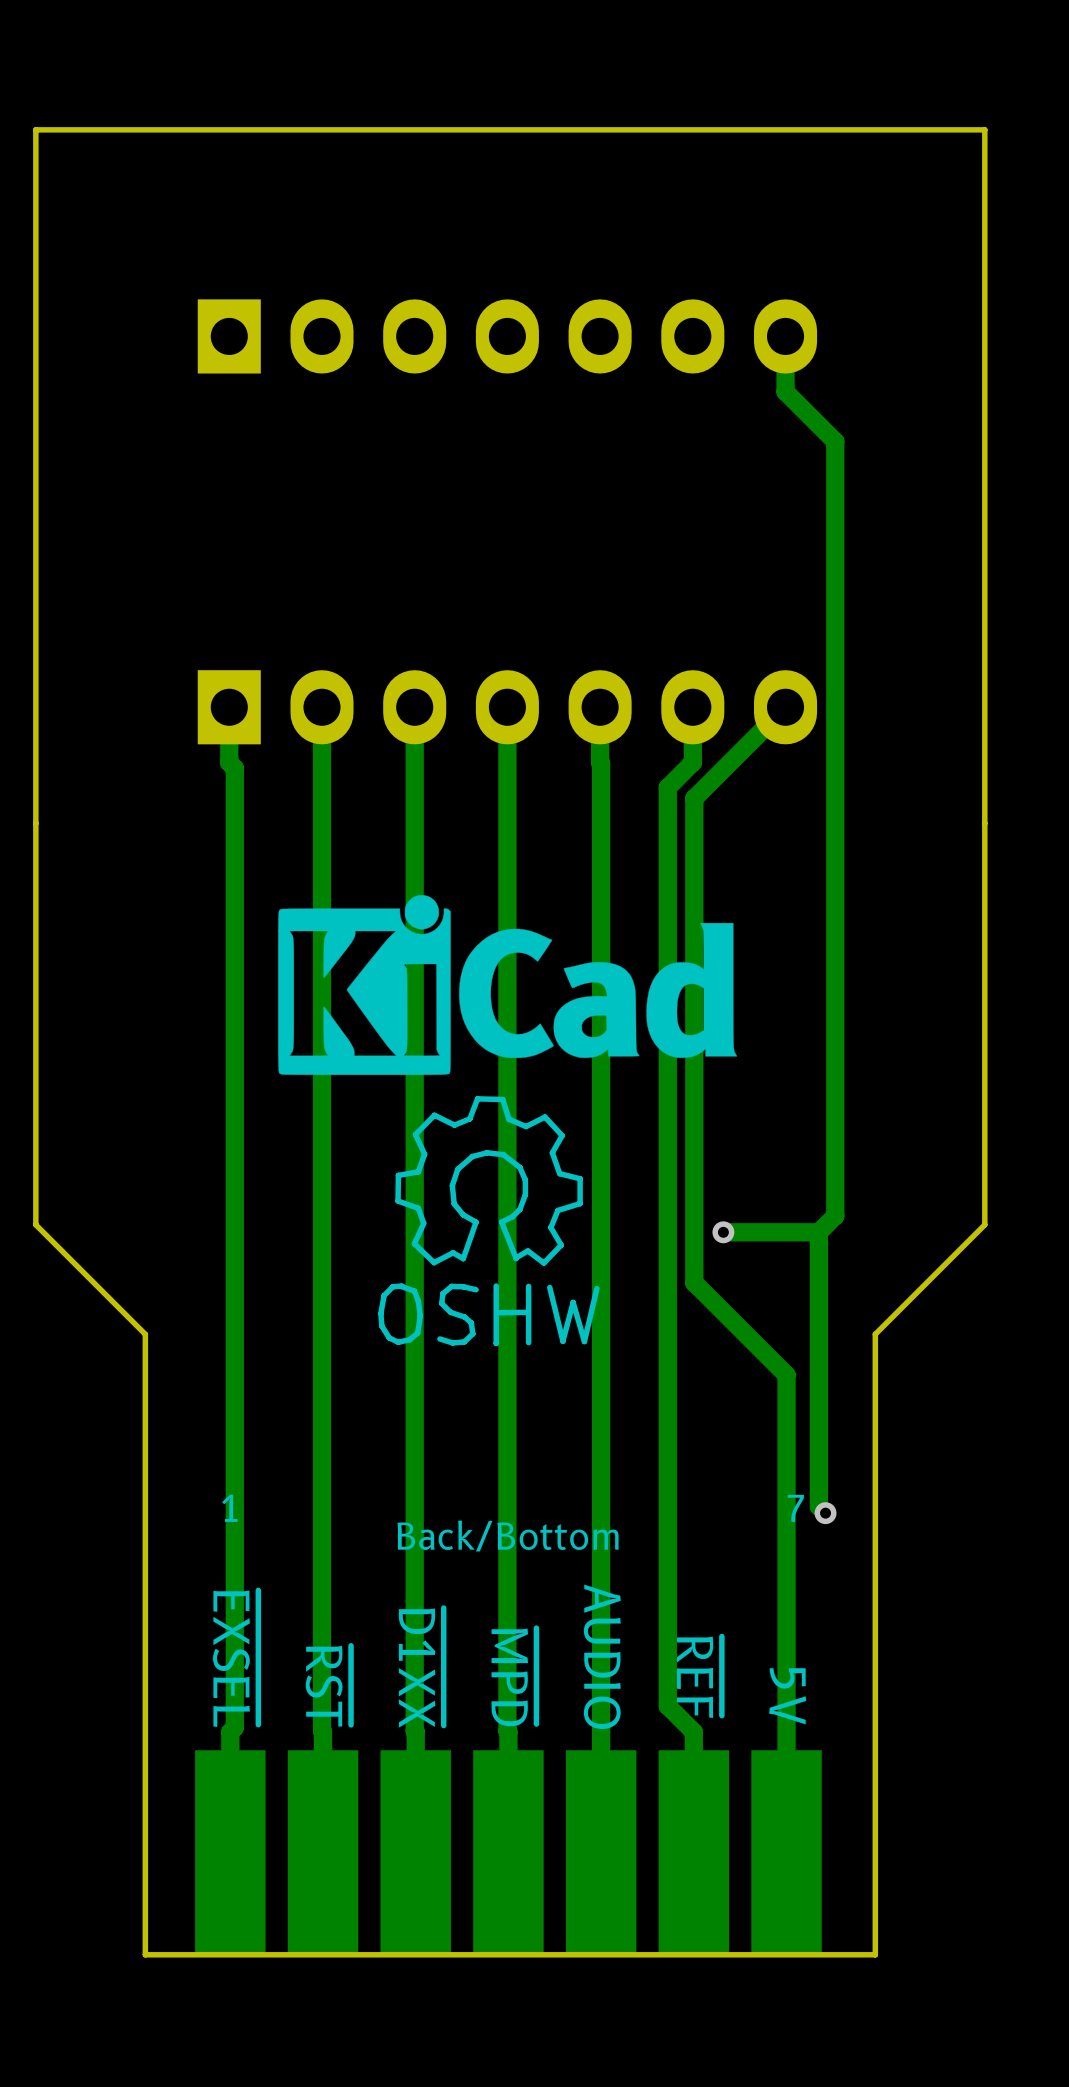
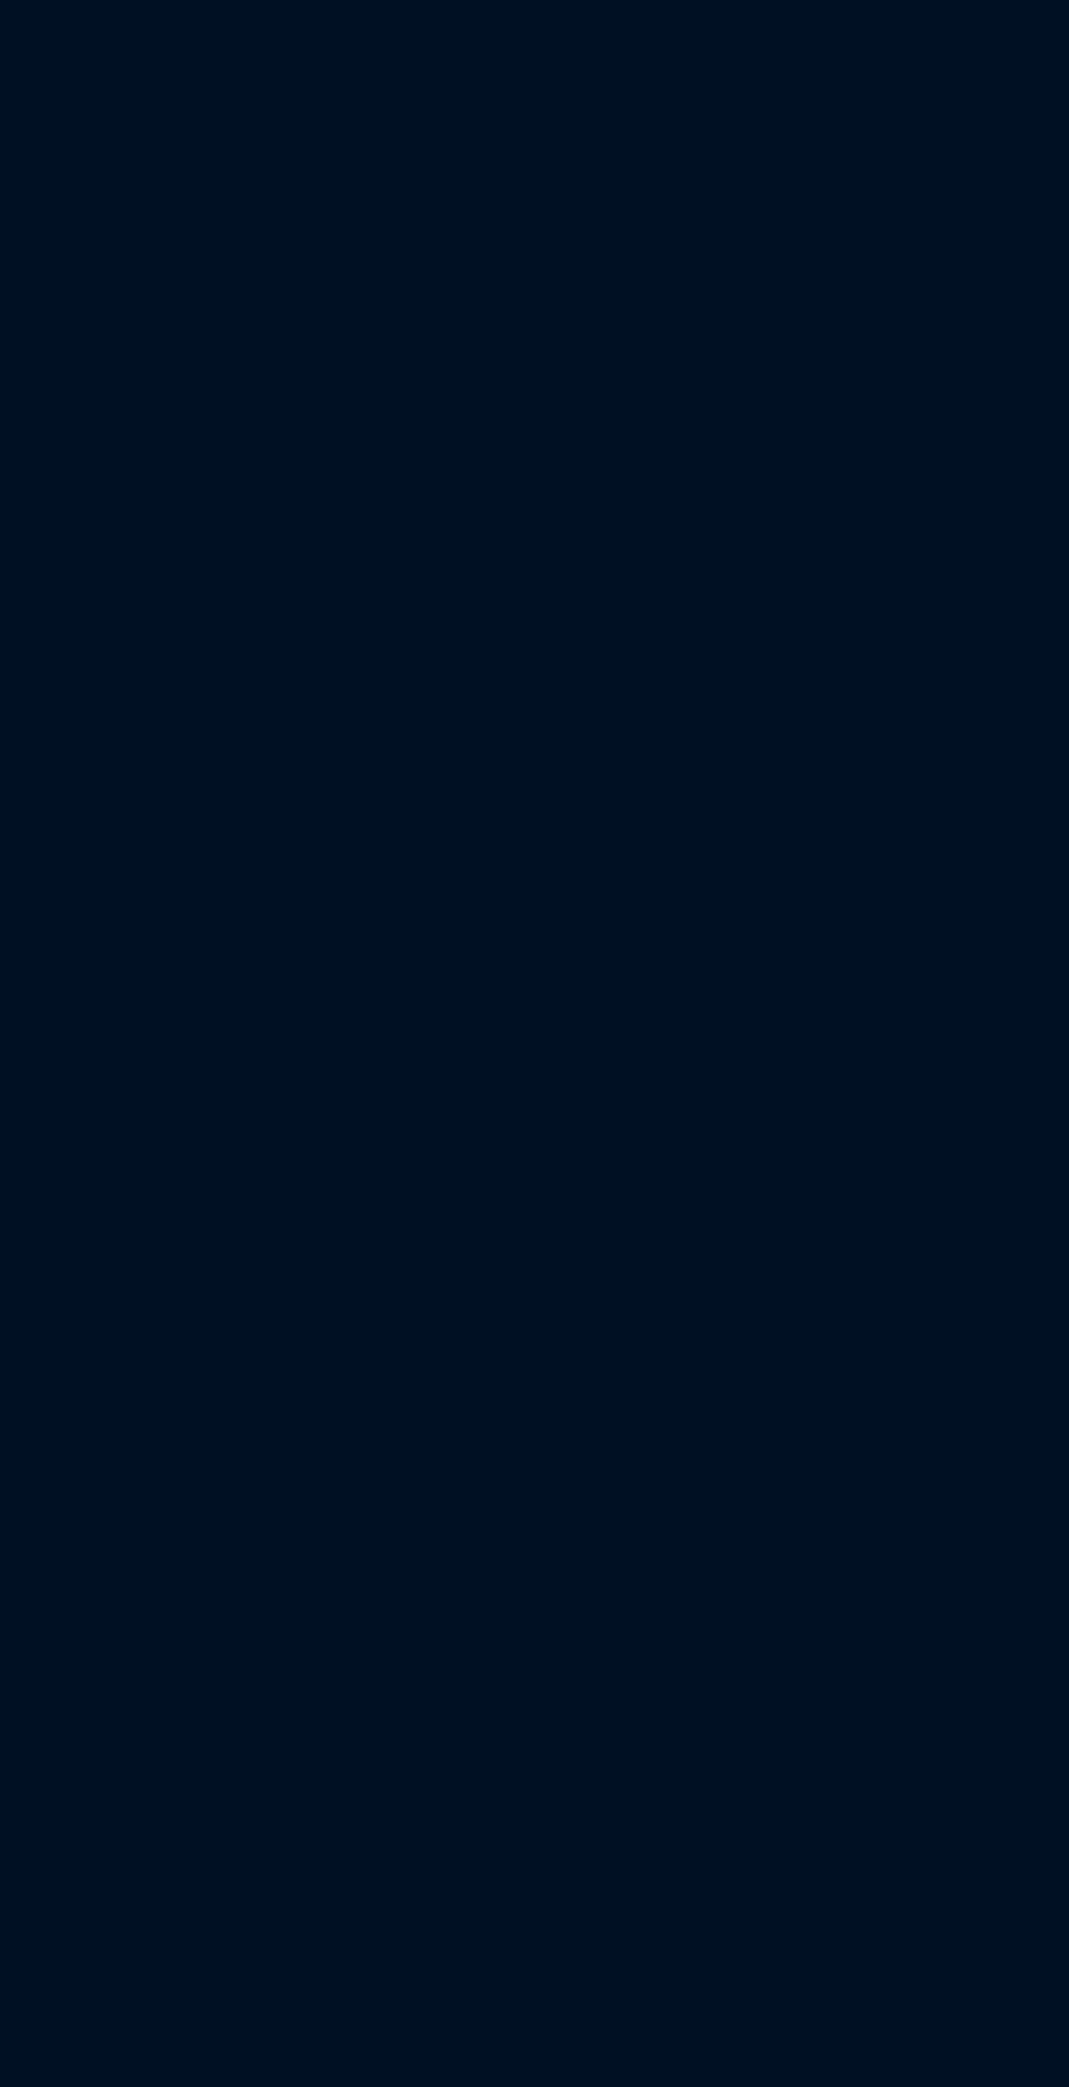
board edge: (984, 129) (984, 1224) (875, 1334) (875, 1954) (145, 1954) (145, 1334) (35, 1224) (35, 129) (984, 129) -> none
part: (507, 336) -> none
track: (785, 336) (785, 391) (835, 441) (835, 1215) (818, 1232) -> none
track: (229, 707) (229, 762) (234, 768) (234, 1727) (230, 1732) (230, 1852) -> none
track: (322, 707) (323, 1852) -> none
track: (414, 707) (415, 1852) -> none
track: (507, 707) (508, 1852) -> none
part: (507, 707) -> none
track: (600, 707) (601, 1852) -> none
track: (692, 707) (692, 762) (667, 787) (667, 1705) (693, 1732) (693, 1852) -> none
track: (785, 707) (694, 798) (694, 1282) (786, 1374) (786, 1852) -> none
drawing: [278, 895, 738, 1347] -> none
via: (723, 1232) -> none
track: (818, 1232) (723, 1232) -> none
track: (818, 1232) (818, 1506) (825, 1513) -> none
via: (825, 1513) -> none
part: (508, 1852) -> none

